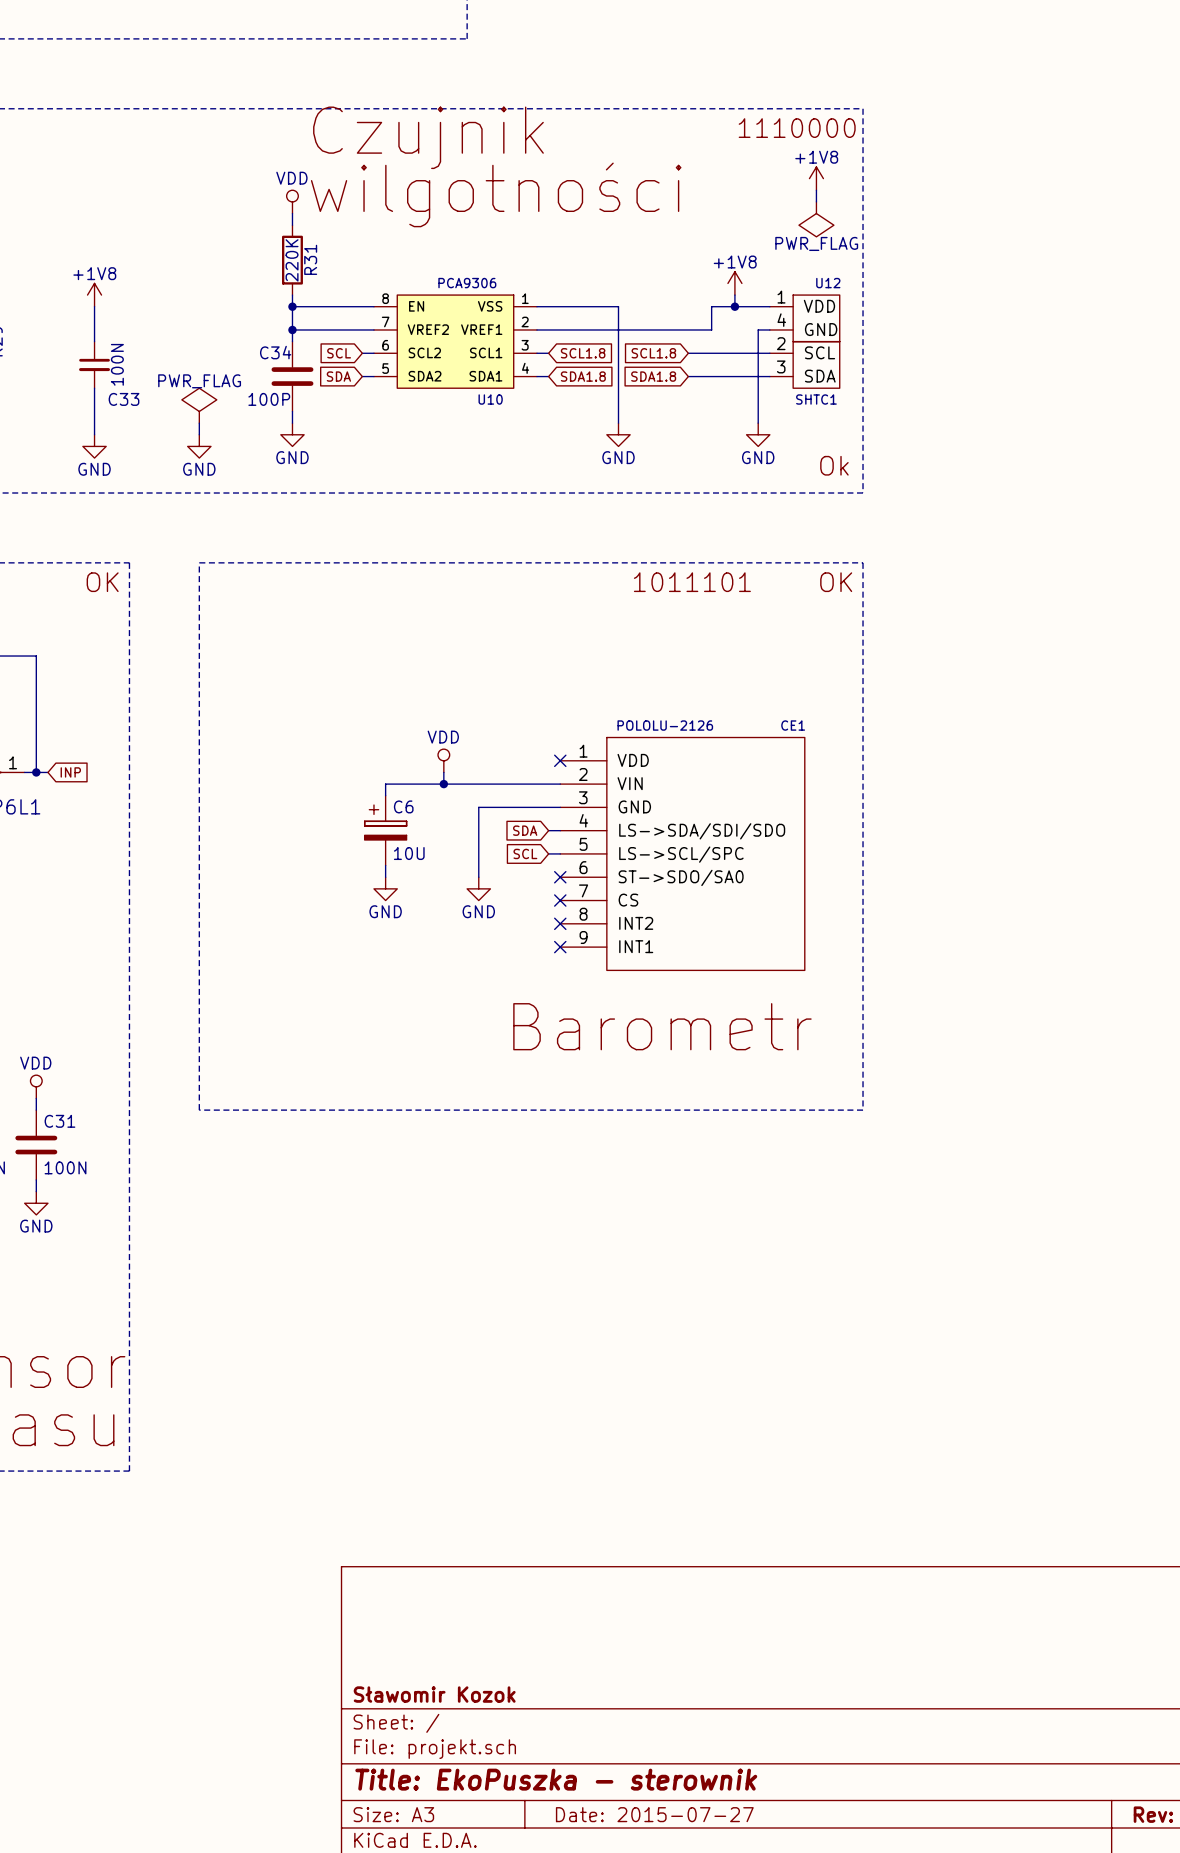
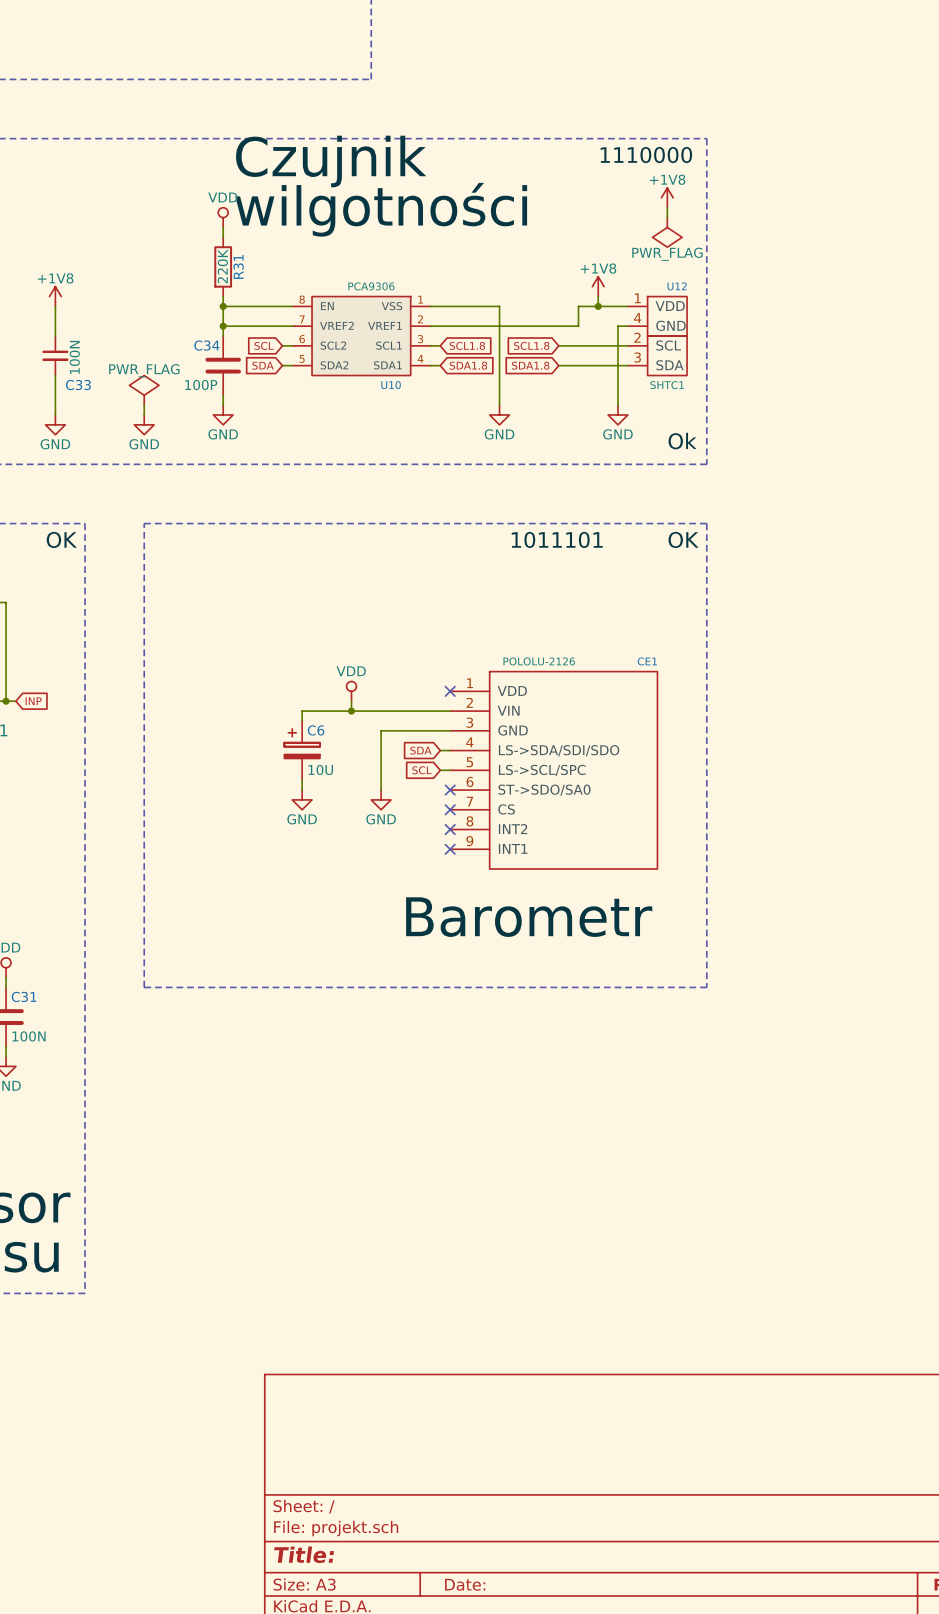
title block: Sławomir Kozok (434, 1694) -> none
title block: Title: EkoPuszka - sterownik (556, 1779) -> Title: (304, 1554)
title block: Date: 2015-07-27 (654, 1814) -> Date: (465, 1584)

